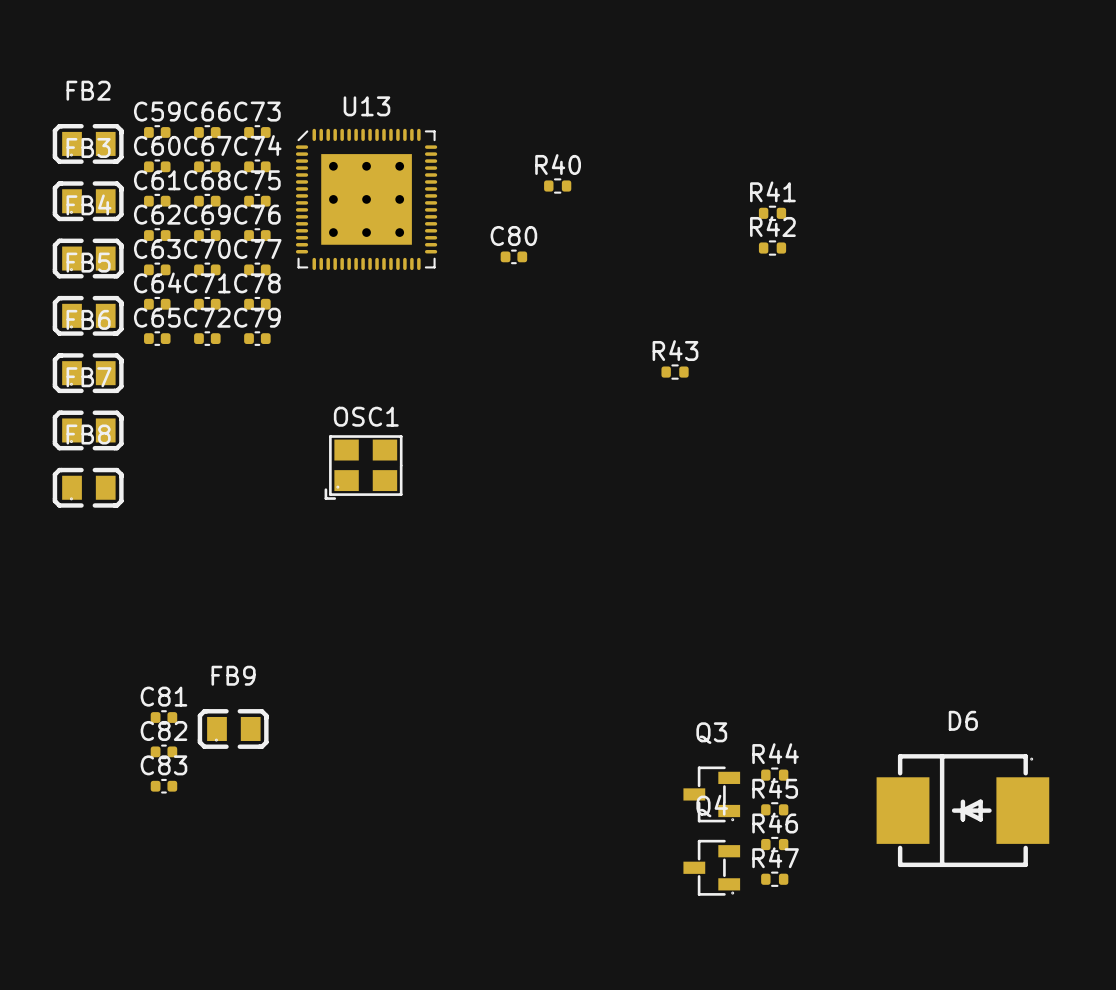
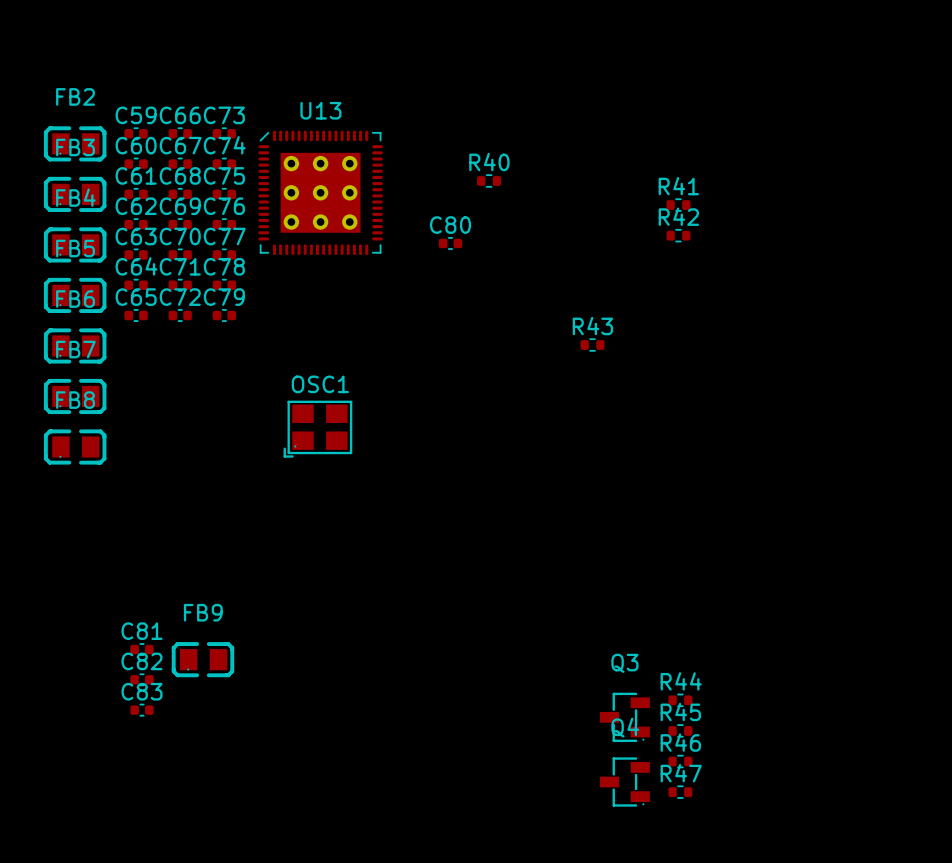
D6: (962, 810) -> none

